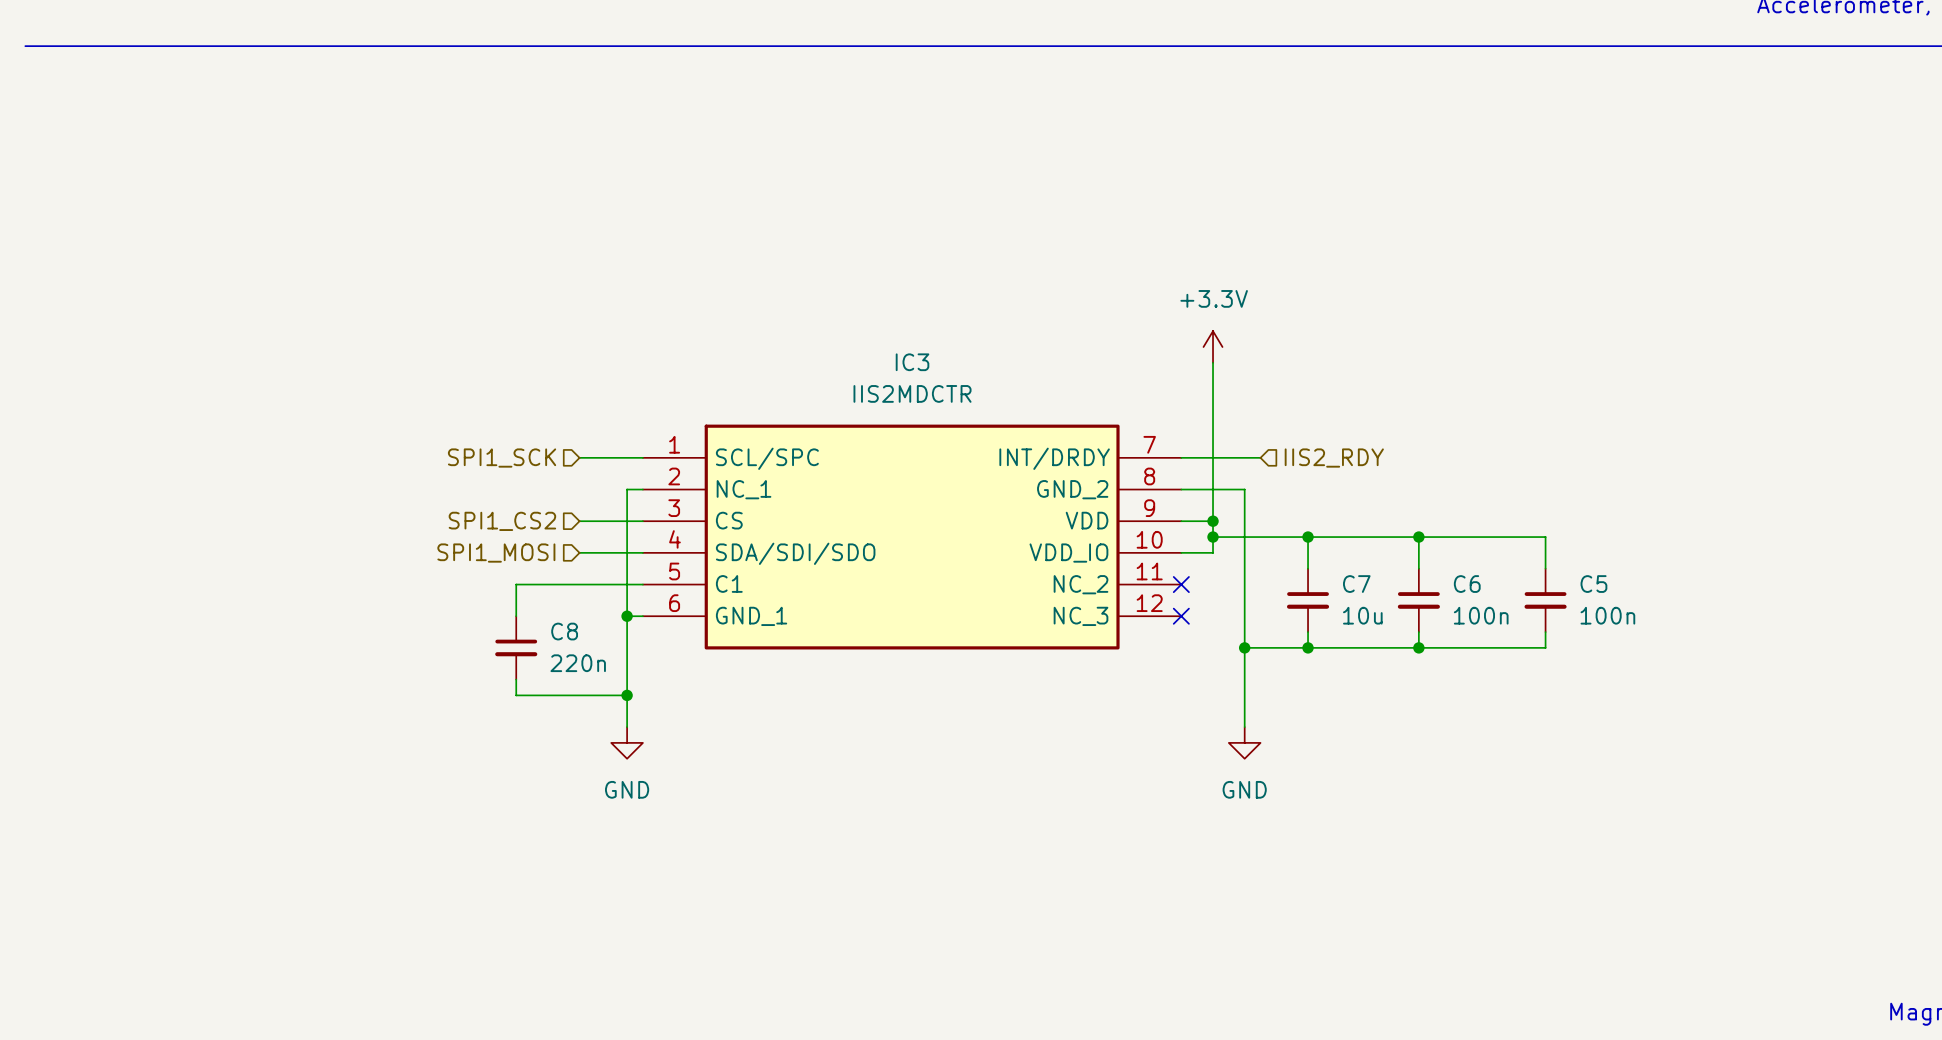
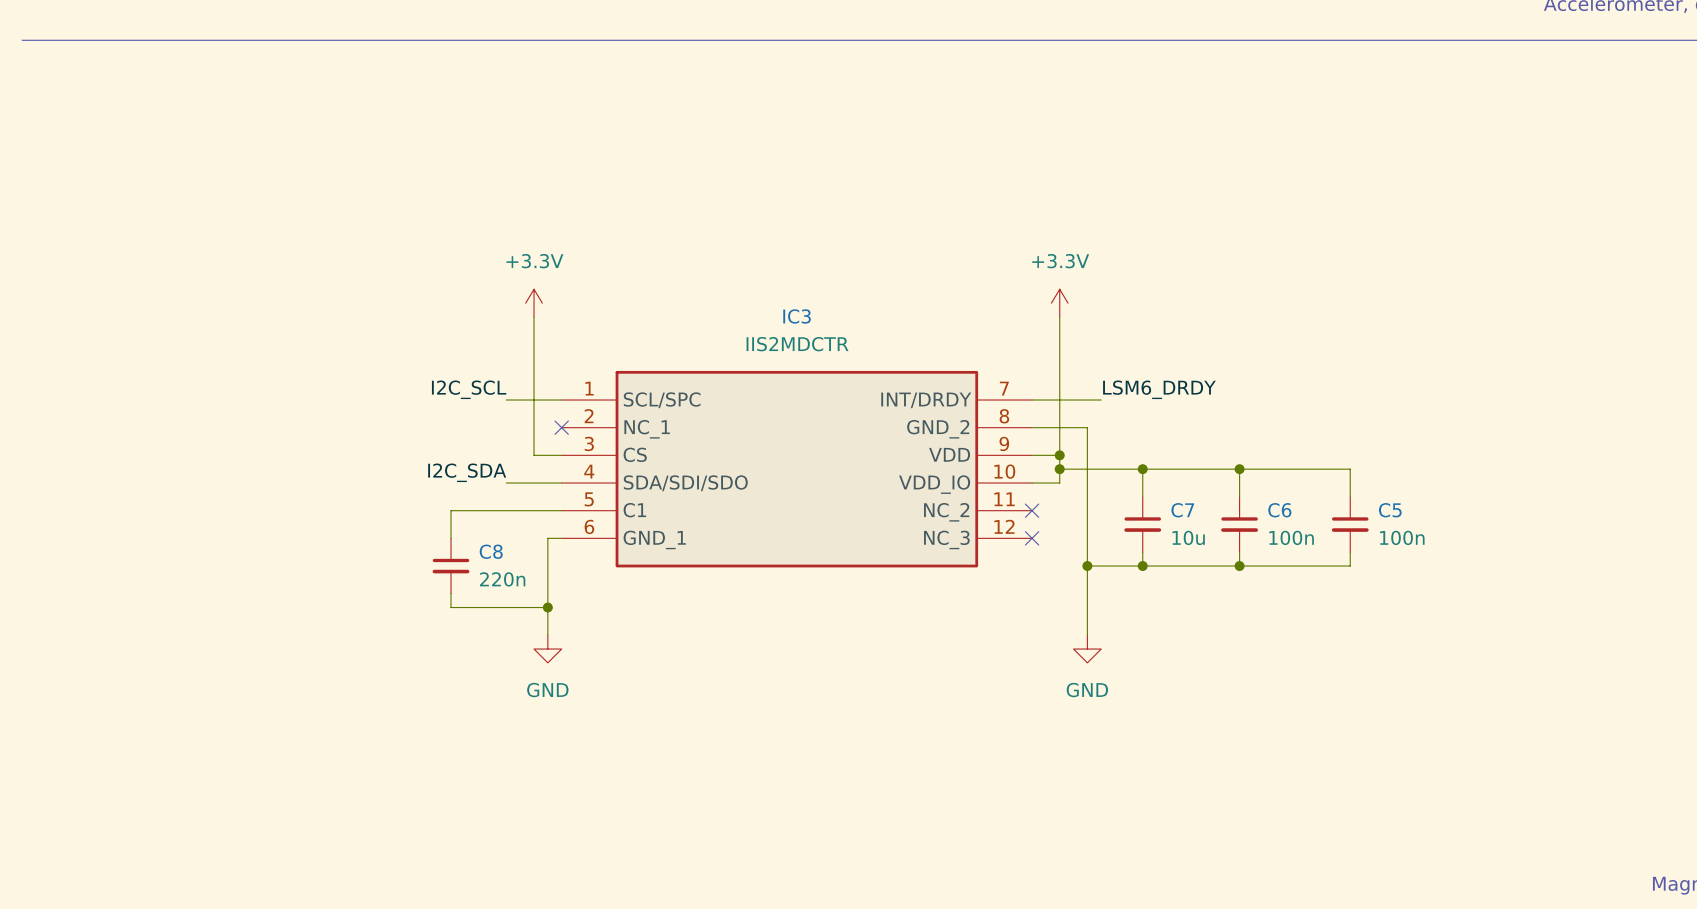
power symbol: none -> +3.3V (534, 303)
label: none -> I2C_SCL (469, 389)
label: none -> LSM6_DRDY (1159, 389)
hierarchical label: SPI1_SCK (502, 458) -> none
hierarchical label: IIS2_RDY (1334, 458) -> none
wire: (642, 489) (627, 489) (627, 616) -> none
no-connect mark: none -> (561, 427)
hierarchical label: SPI1_CS2 (502, 521) -> none
wire: (579, 521) (611, 521) -> (534, 317) (534, 455)
label: none -> I2C_SDA (467, 472)
hierarchical label: SPI1_MOSI (496, 553) -> none
junction: (627, 616) -> none

